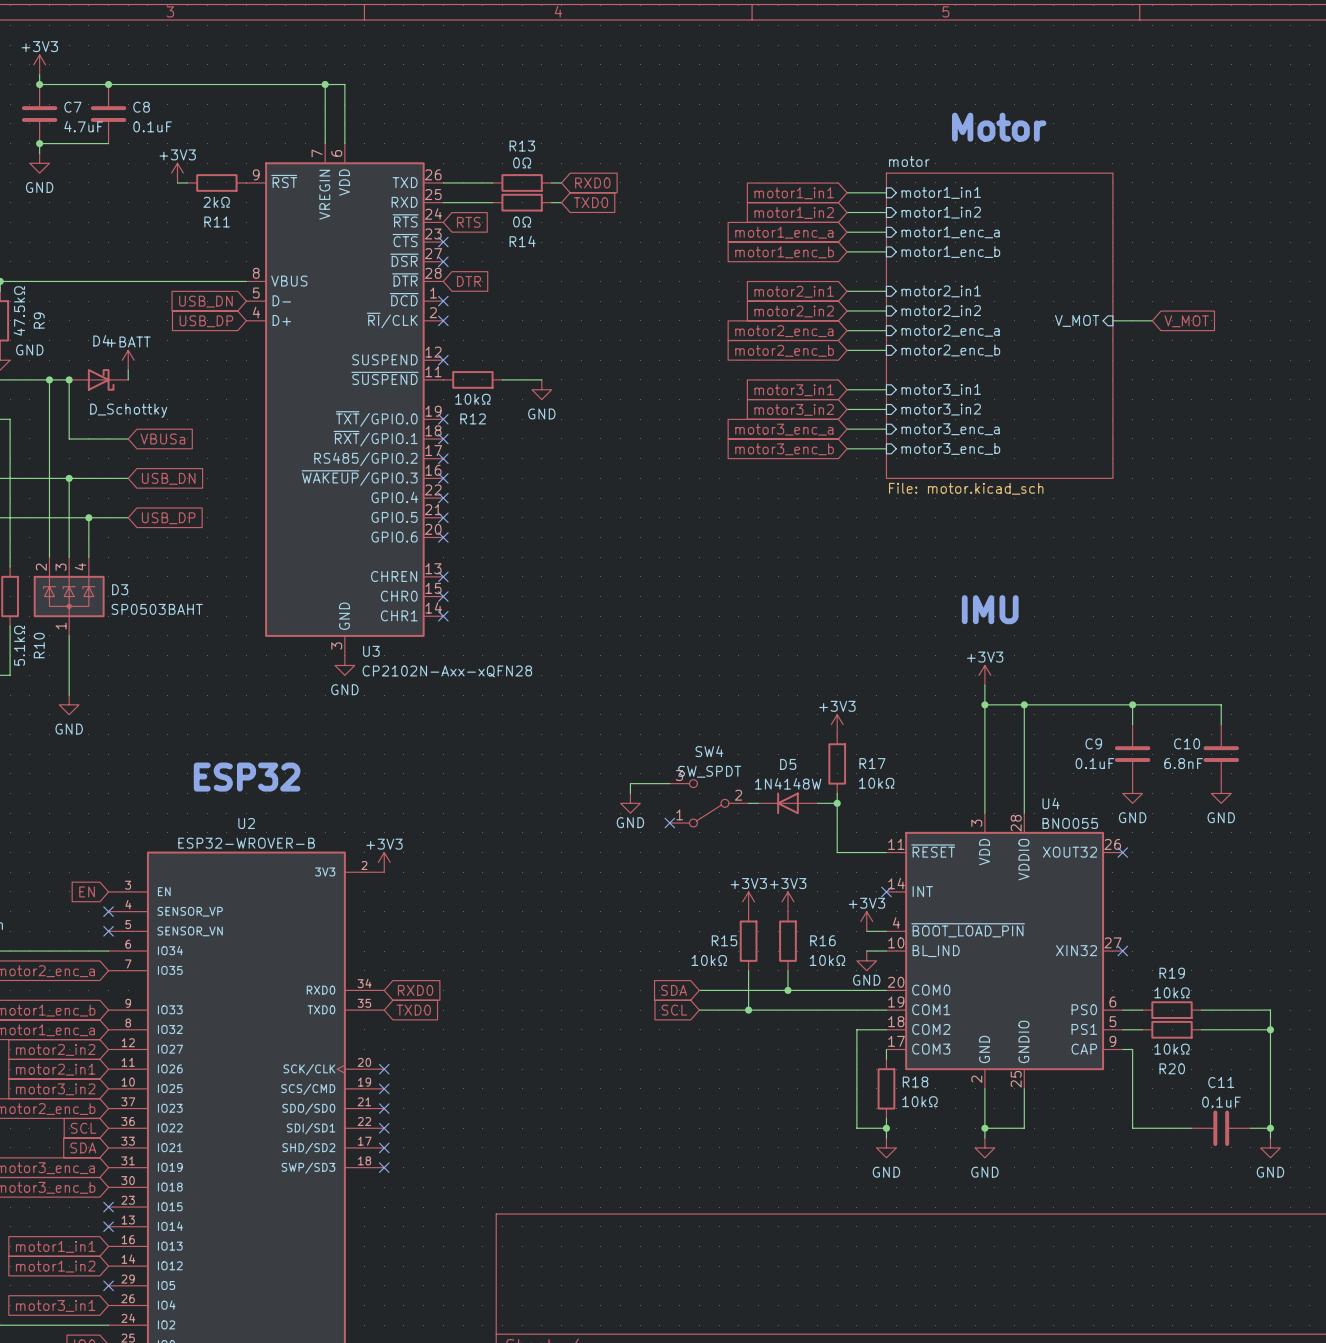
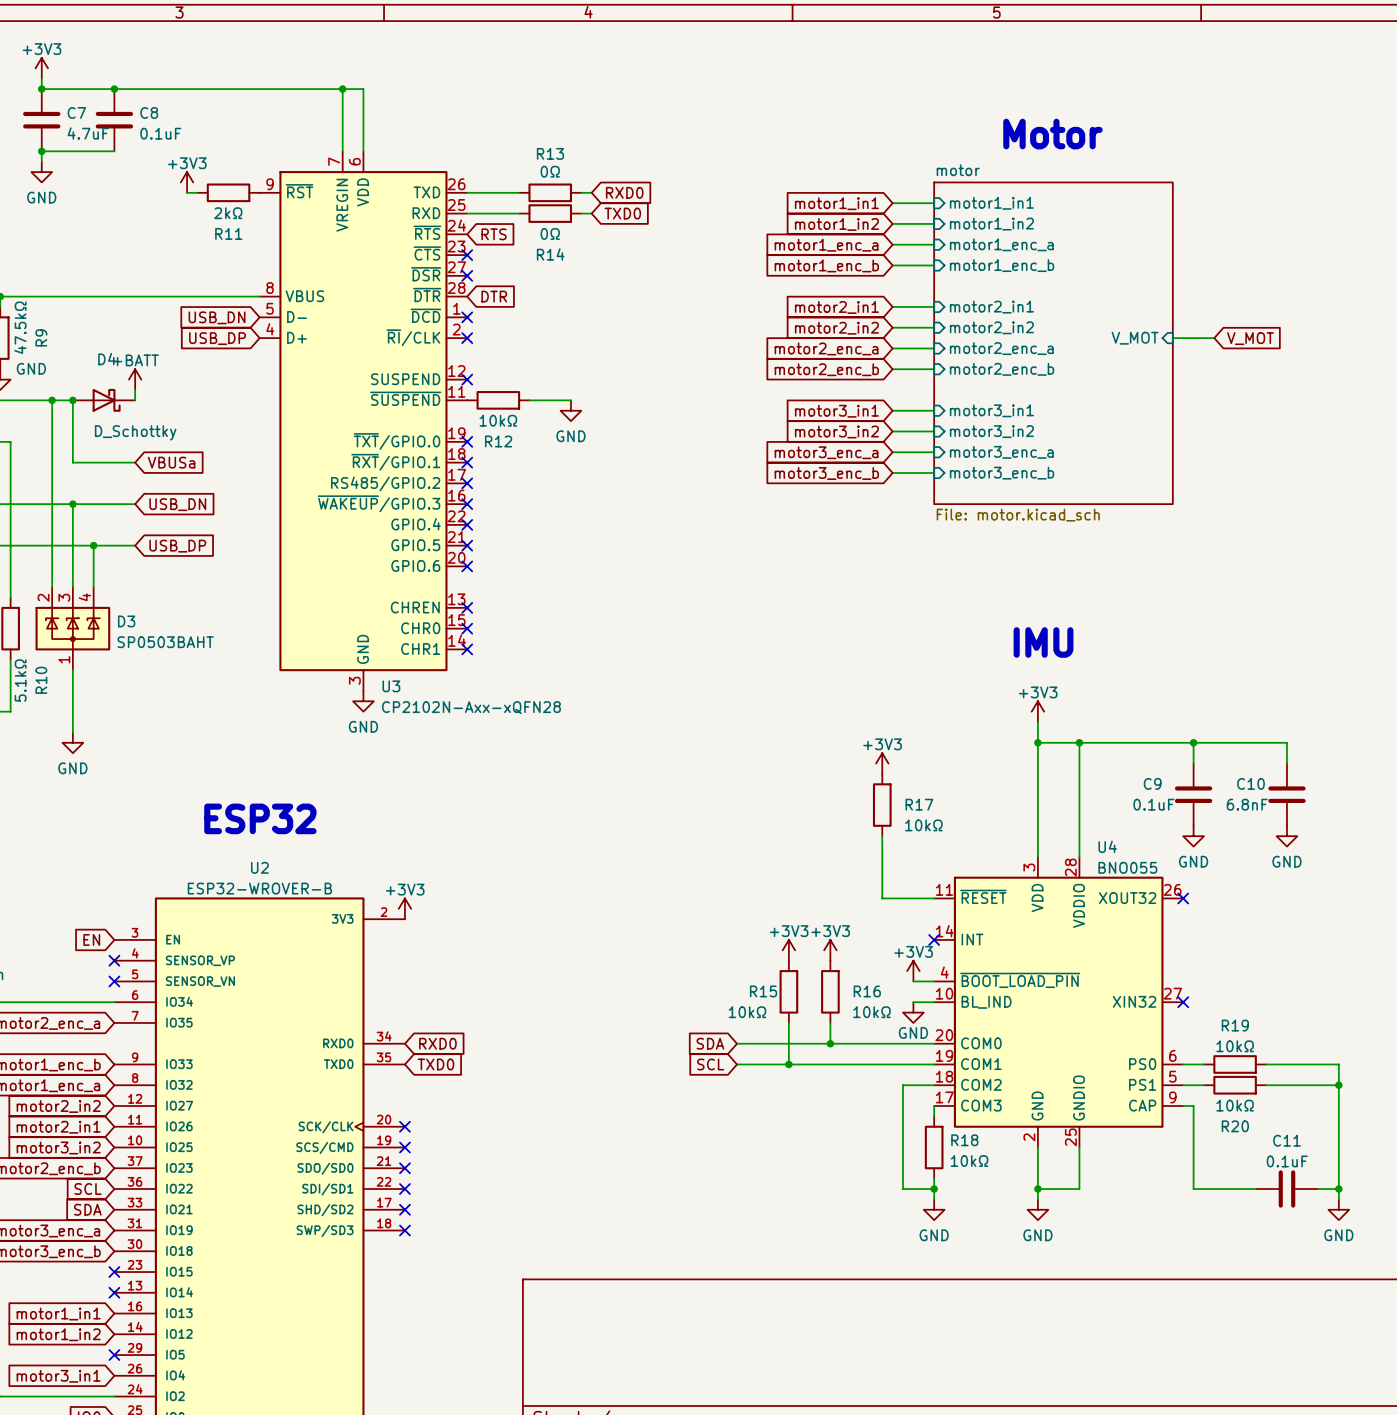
wire: (669, 783) (630, 783) (630, 793) -> none
power symbol: GND (630, 803) -> none
SW4: SW_SPDT (709, 803) -> none
wire: (748, 803) (758, 803) -> none
D5: 1N4148W (787, 803) -> none
wire: (817, 803) (837, 803) -> none
junction: (837, 803) -> none
no-connect mark: (669, 823) -> none

